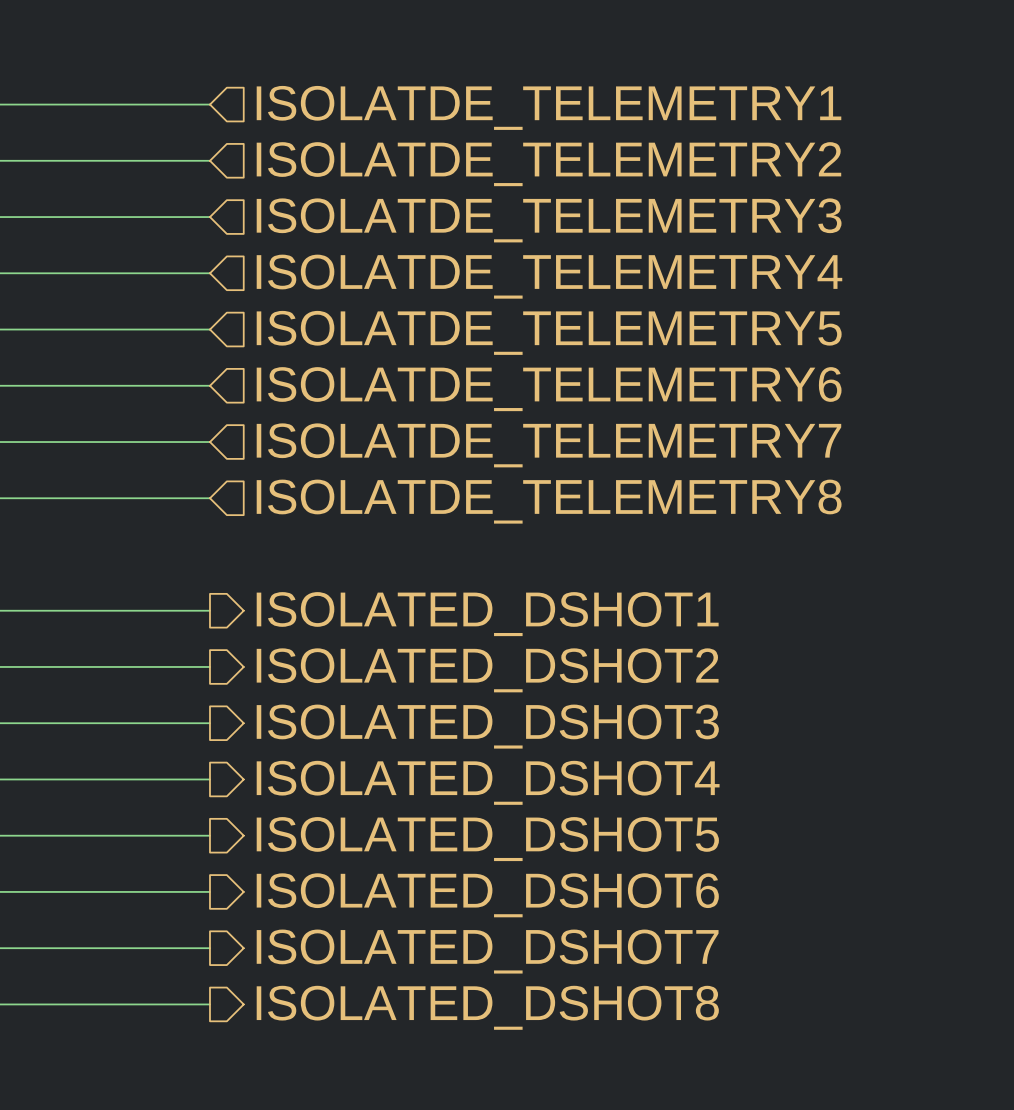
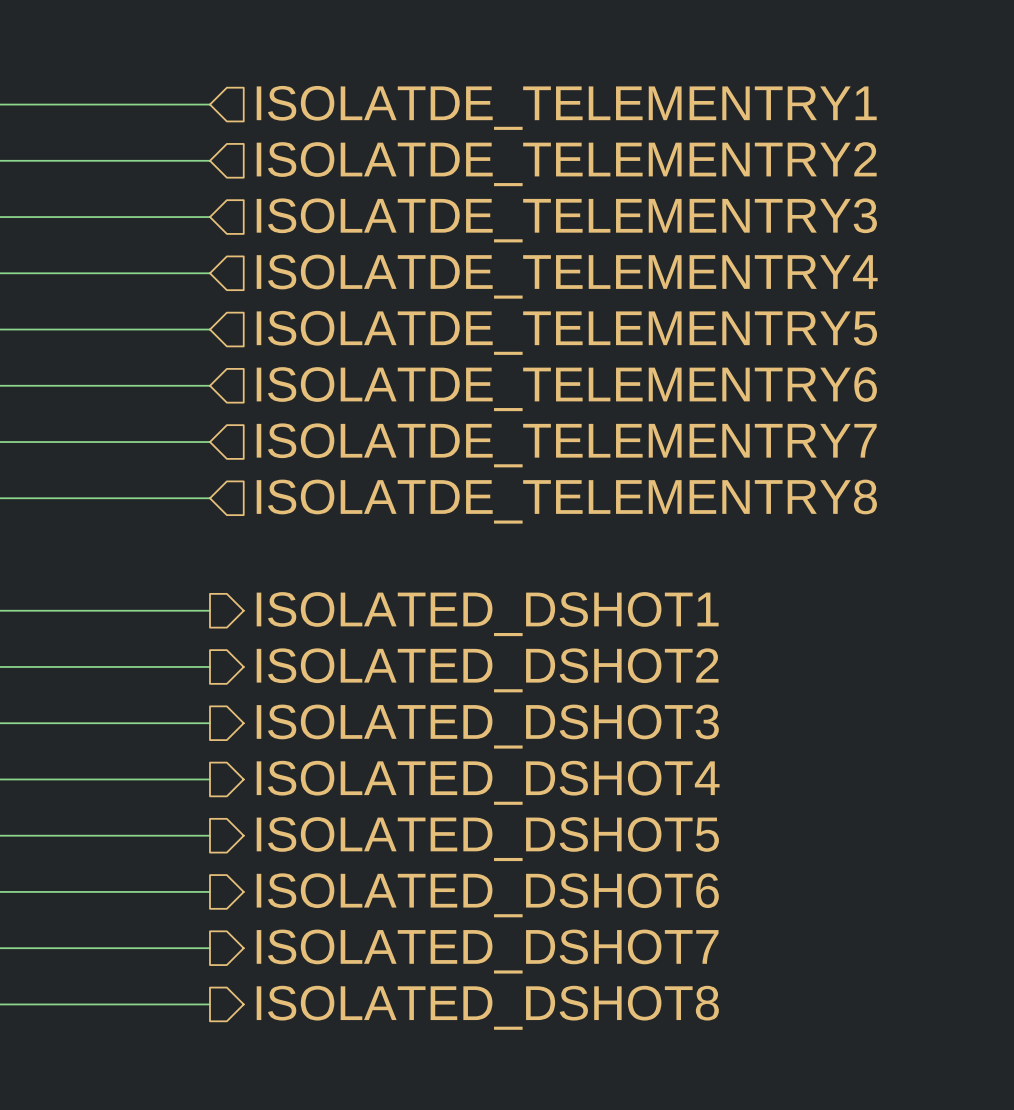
hierarchical label: ISOLATDE_TELEMETRY1 (548, 107) -> ISOLATDE_TELEMENTRY1 (566, 107)
hierarchical label: ISOLATDE_TELEMETRY2 (548, 164) -> ISOLATDE_TELEMENTRY2 (566, 164)
hierarchical label: ISOLATDE_TELEMETRY3 (549, 220) -> ISOLATDE_TELEMENTRY3 (566, 220)
hierarchical label: ISOLATDE_TELEMETRY4 (549, 276) -> ISOLATDE_TELEMENTRY4 (567, 276)
hierarchical label: ISOLATDE_TELEMETRY5 (549, 332) -> ISOLATDE_TELEMENTRY5 (566, 332)
hierarchical label: ISOLATDE_TELEMETRY6 (549, 389) -> ISOLATDE_TELEMENTRY6 (566, 389)
hierarchical label: ISOLATDE_TELEMETRY7 (548, 445) -> ISOLATDE_TELEMENTRY7 (566, 445)
hierarchical label: ISOLATDE_TELEMETRY8 (549, 501) -> ISOLATDE_TELEMENTRY8 (566, 501)

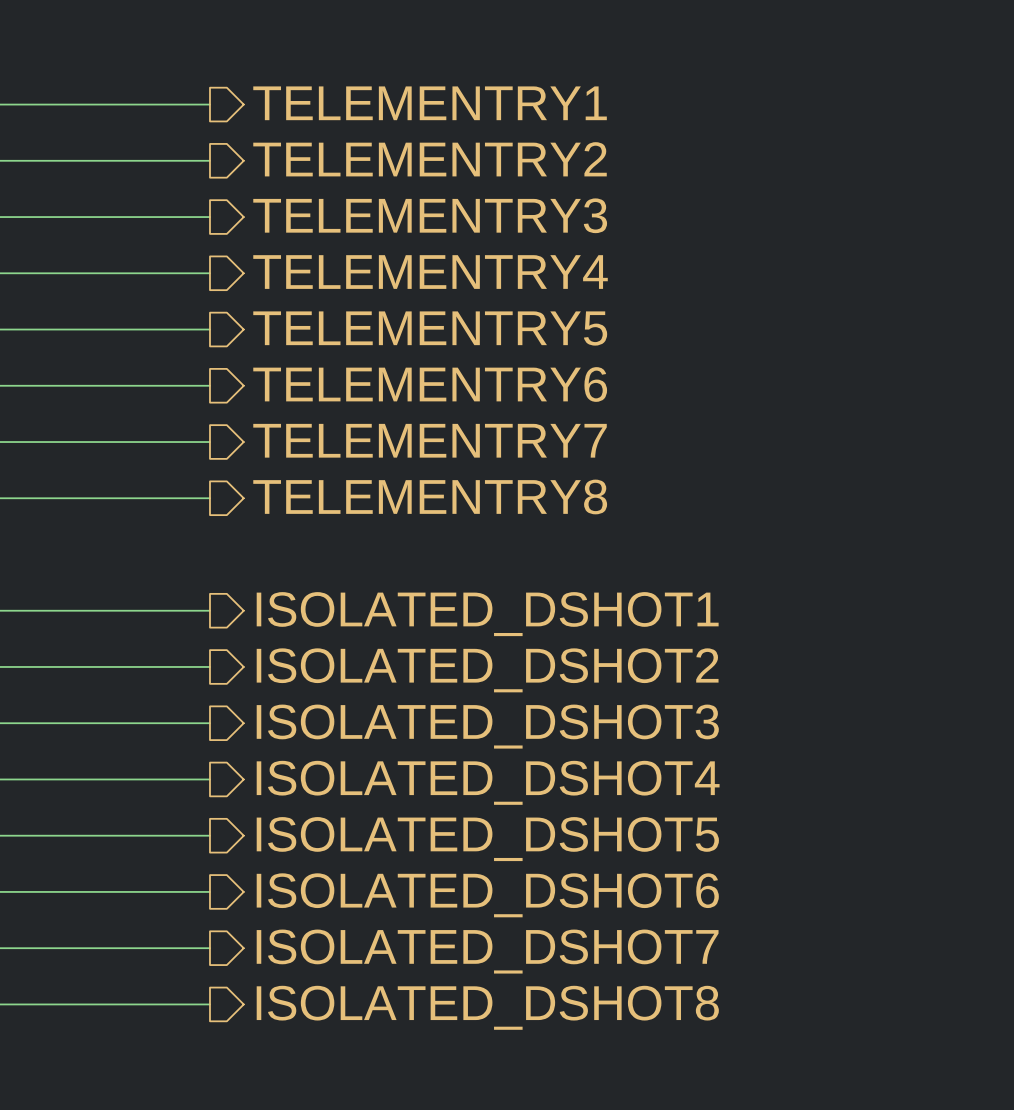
hierarchical label shape: input (566, 107) -> output (430, 103)
hierarchical label: ISOLATDE_TELEMENTRY1 (566, 107) -> TELEMENTRY1 (430, 103)
hierarchical label shape: input (566, 164) -> output (430, 159)
hierarchical label: ISOLATDE_TELEMENTRY2 (566, 164) -> TELEMENTRY2 (430, 159)
hierarchical label shape: input (566, 220) -> output (430, 215)
hierarchical label: ISOLATDE_TELEMENTRY3 (566, 220) -> TELEMENTRY3 (430, 215)
hierarchical label shape: input (567, 276) -> output (430, 272)
hierarchical label: ISOLATDE_TELEMENTRY4 (567, 276) -> TELEMENTRY4 (430, 272)
hierarchical label shape: input (566, 332) -> output (430, 328)
hierarchical label: ISOLATDE_TELEMENTRY5 (566, 332) -> TELEMENTRY5 (430, 328)
hierarchical label shape: input (566, 389) -> output (430, 384)
hierarchical label: ISOLATDE_TELEMENTRY6 (566, 389) -> TELEMENTRY6 (430, 384)
hierarchical label shape: input (566, 445) -> output (430, 440)
hierarchical label: ISOLATDE_TELEMENTRY7 (566, 445) -> TELEMENTRY7 (430, 440)
hierarchical label shape: input (566, 501) -> output (430, 496)
hierarchical label: ISOLATDE_TELEMENTRY8 (566, 501) -> TELEMENTRY8 (430, 496)

